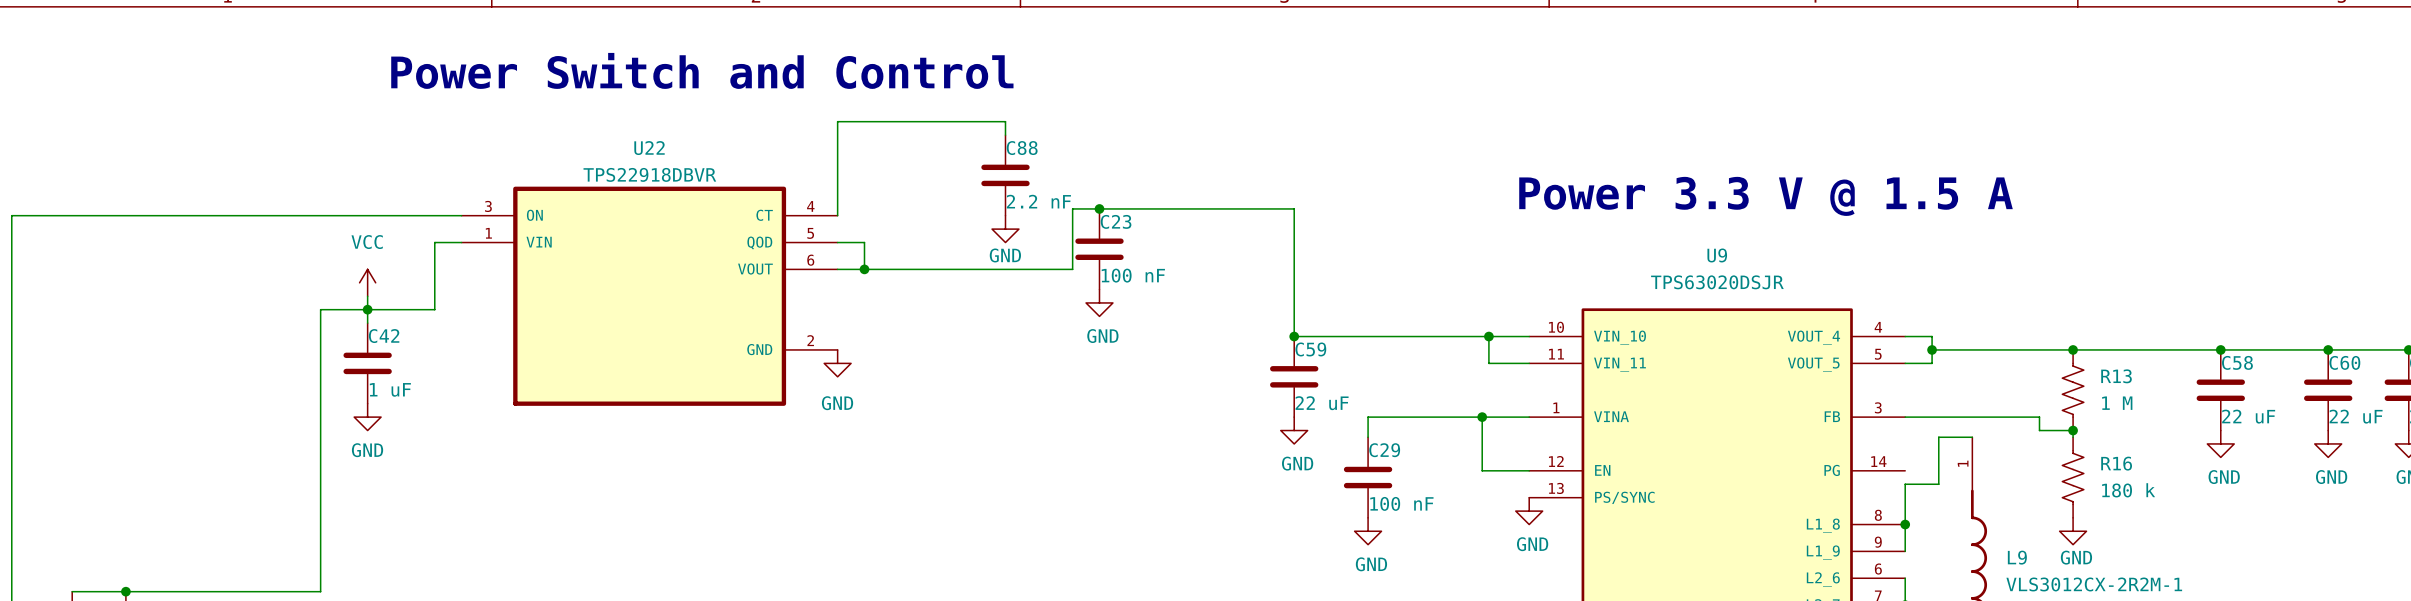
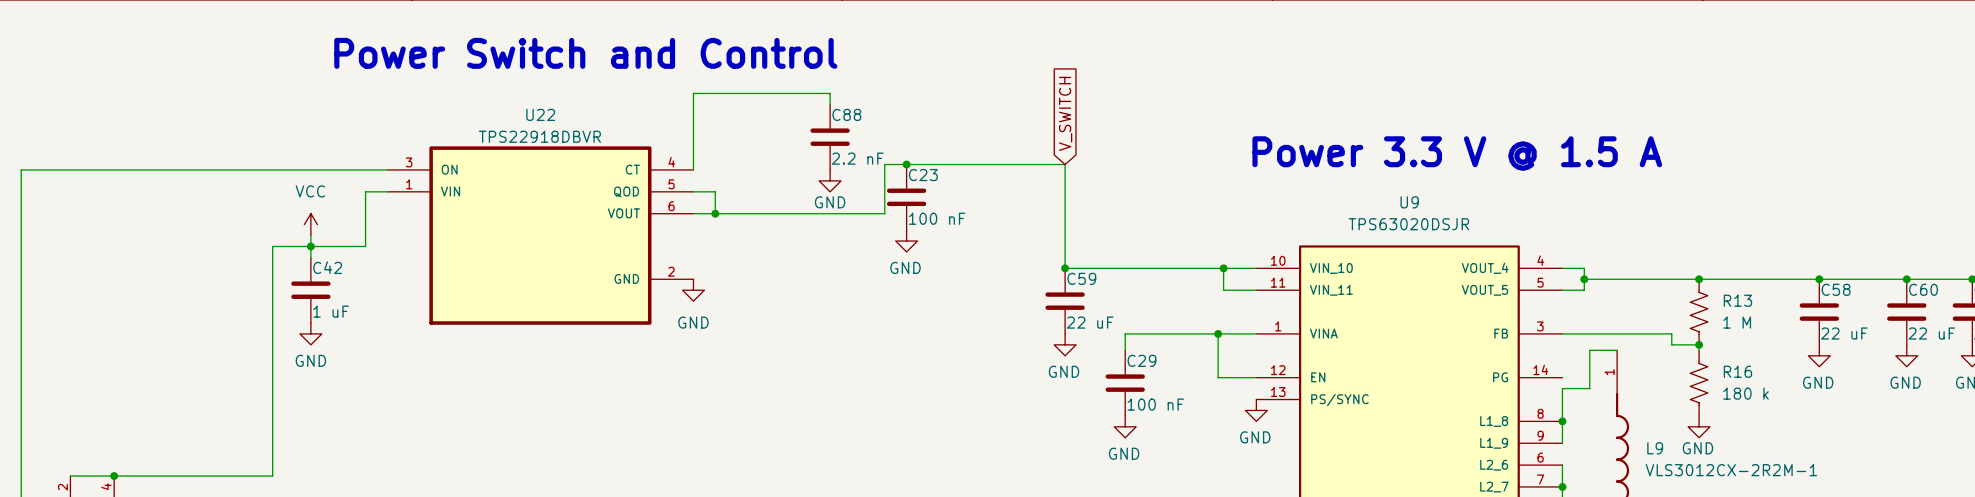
global label: none -> V_SWITCH (1065, 113)

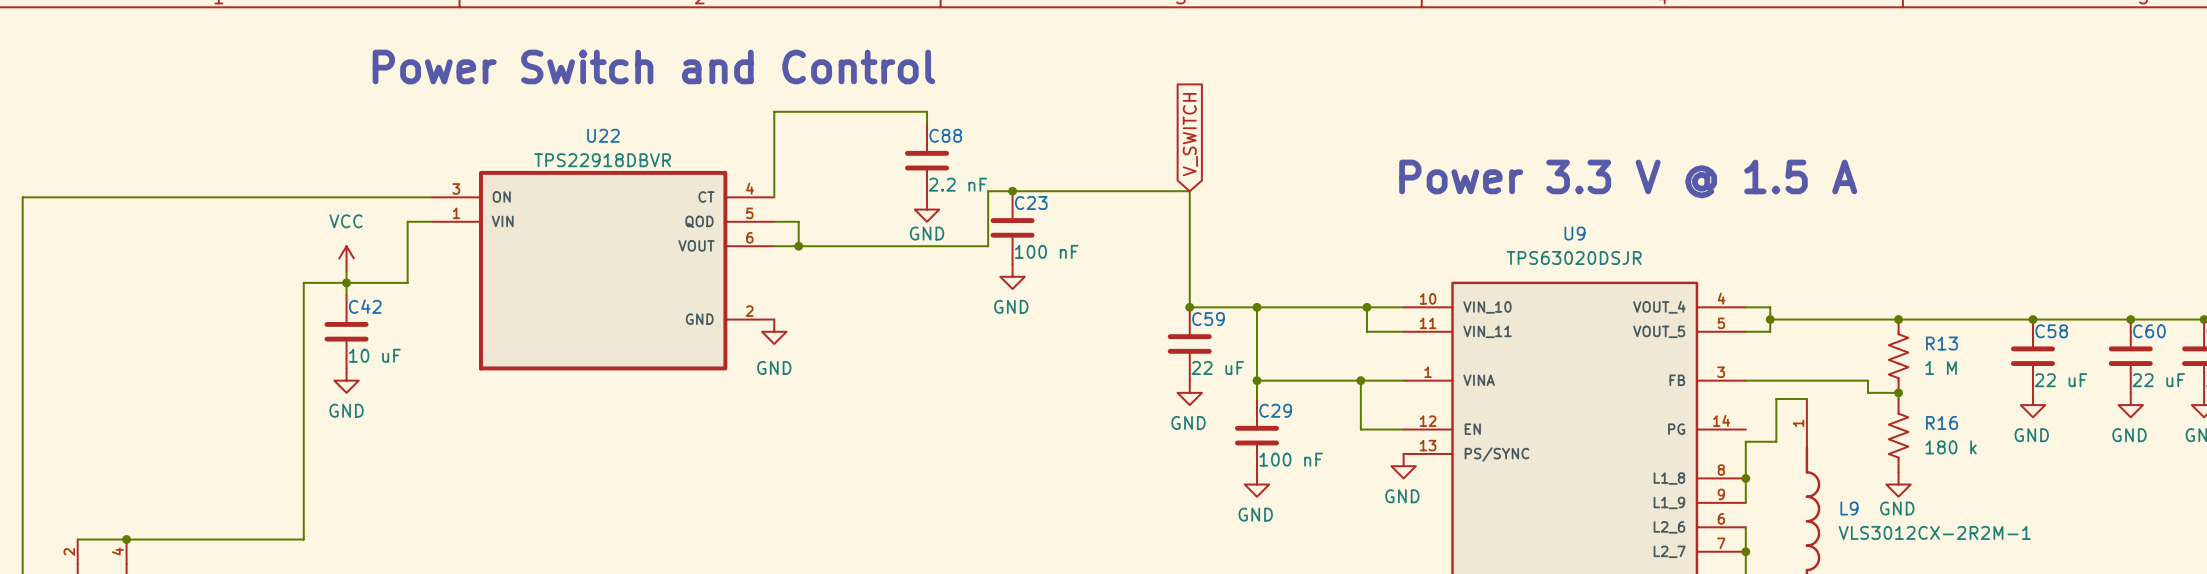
wire: none -> (1256, 307) (1256, 380)
junction: none -> (1256, 307)
C42 value: 1 uF (331, 311) -> 10 uF (374, 355)
junction: none -> (1256, 380)

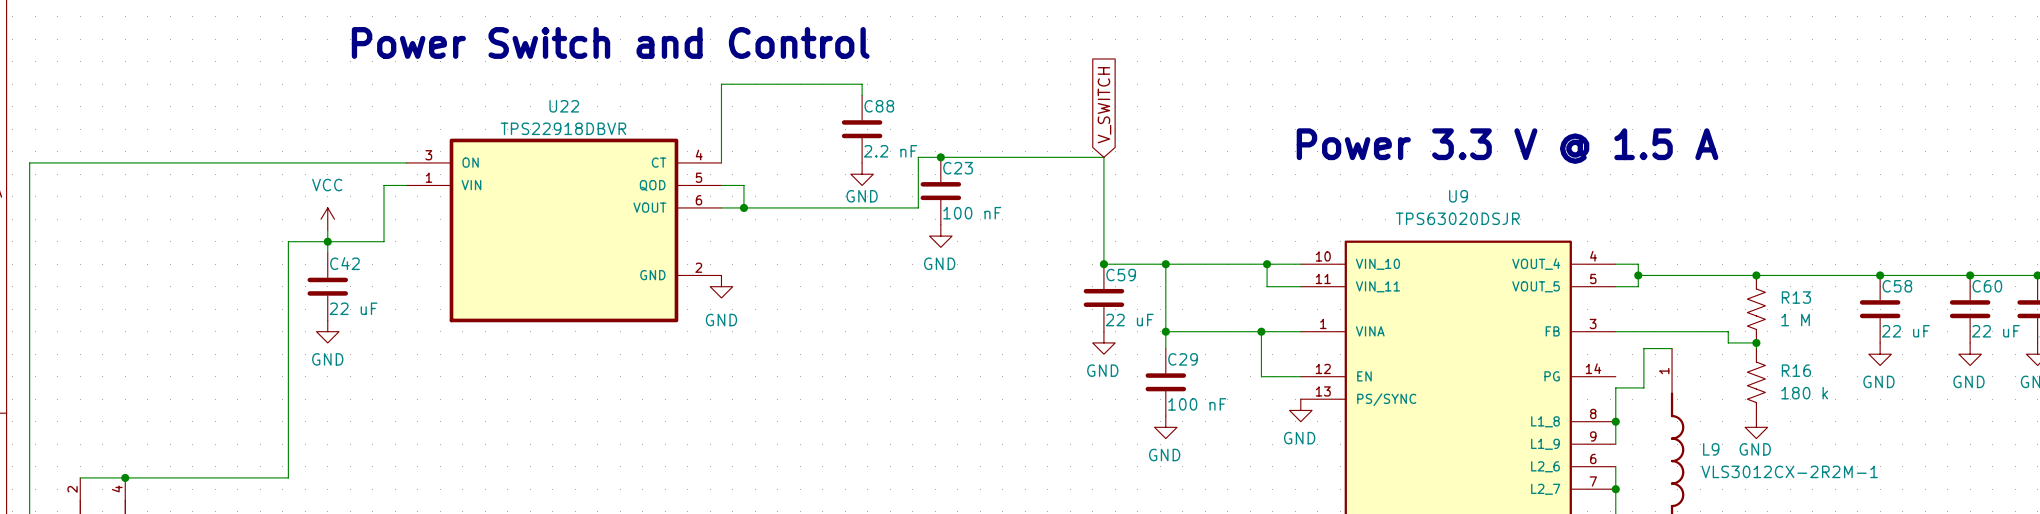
C42 value: 10 uF (374, 355) -> 22 uF (353, 308)

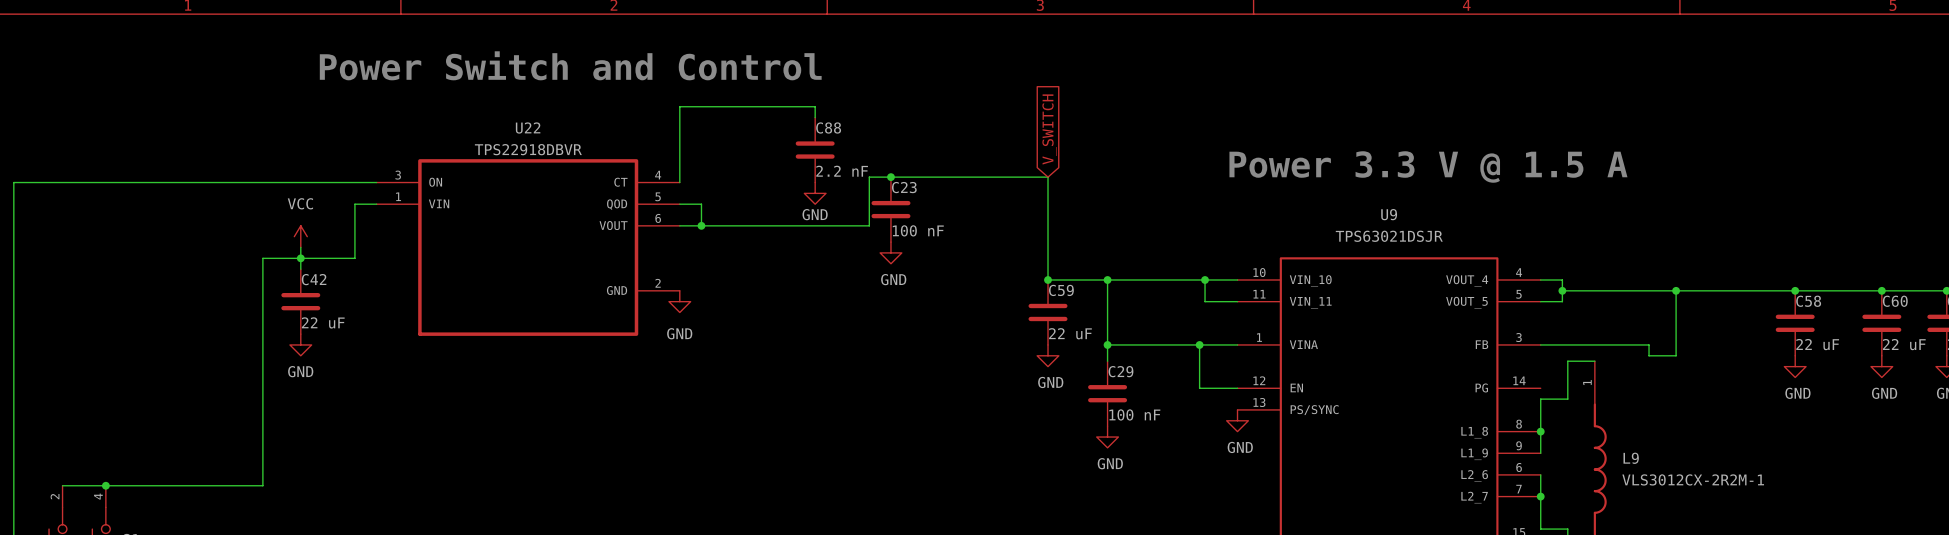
U9 value: TPS63020DSJR (1457, 218) -> TPS63021DSJR (1389, 236)
R13: 1 M (1756, 309) -> none
junction: (1756, 342) -> none
R16: 180 k (1756, 382) -> none
power symbol: GND (1756, 427) -> none

